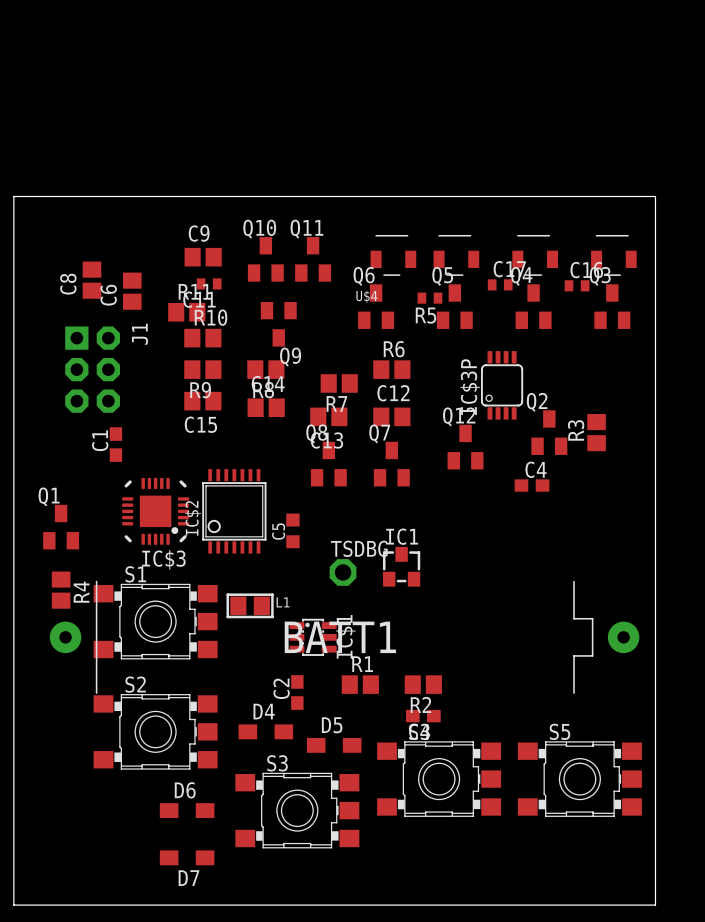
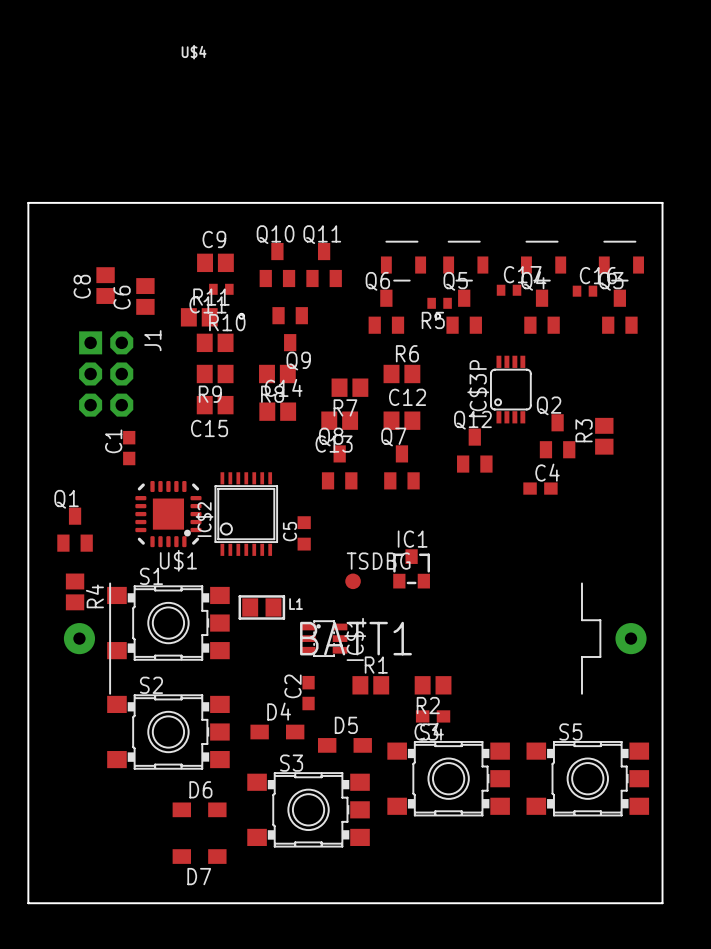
U$4 footprint: [356, 290, 378, 304] -> [239, 313, 441, 319]
U$4 name position: U$4 (366, 296) -> U$4 (194, 52)
IC$3: (155, 511) -> none
U$1: none -> (168, 514)
TSDBG footprint: [329, 559, 357, 586] -> [345, 573, 361, 590]

